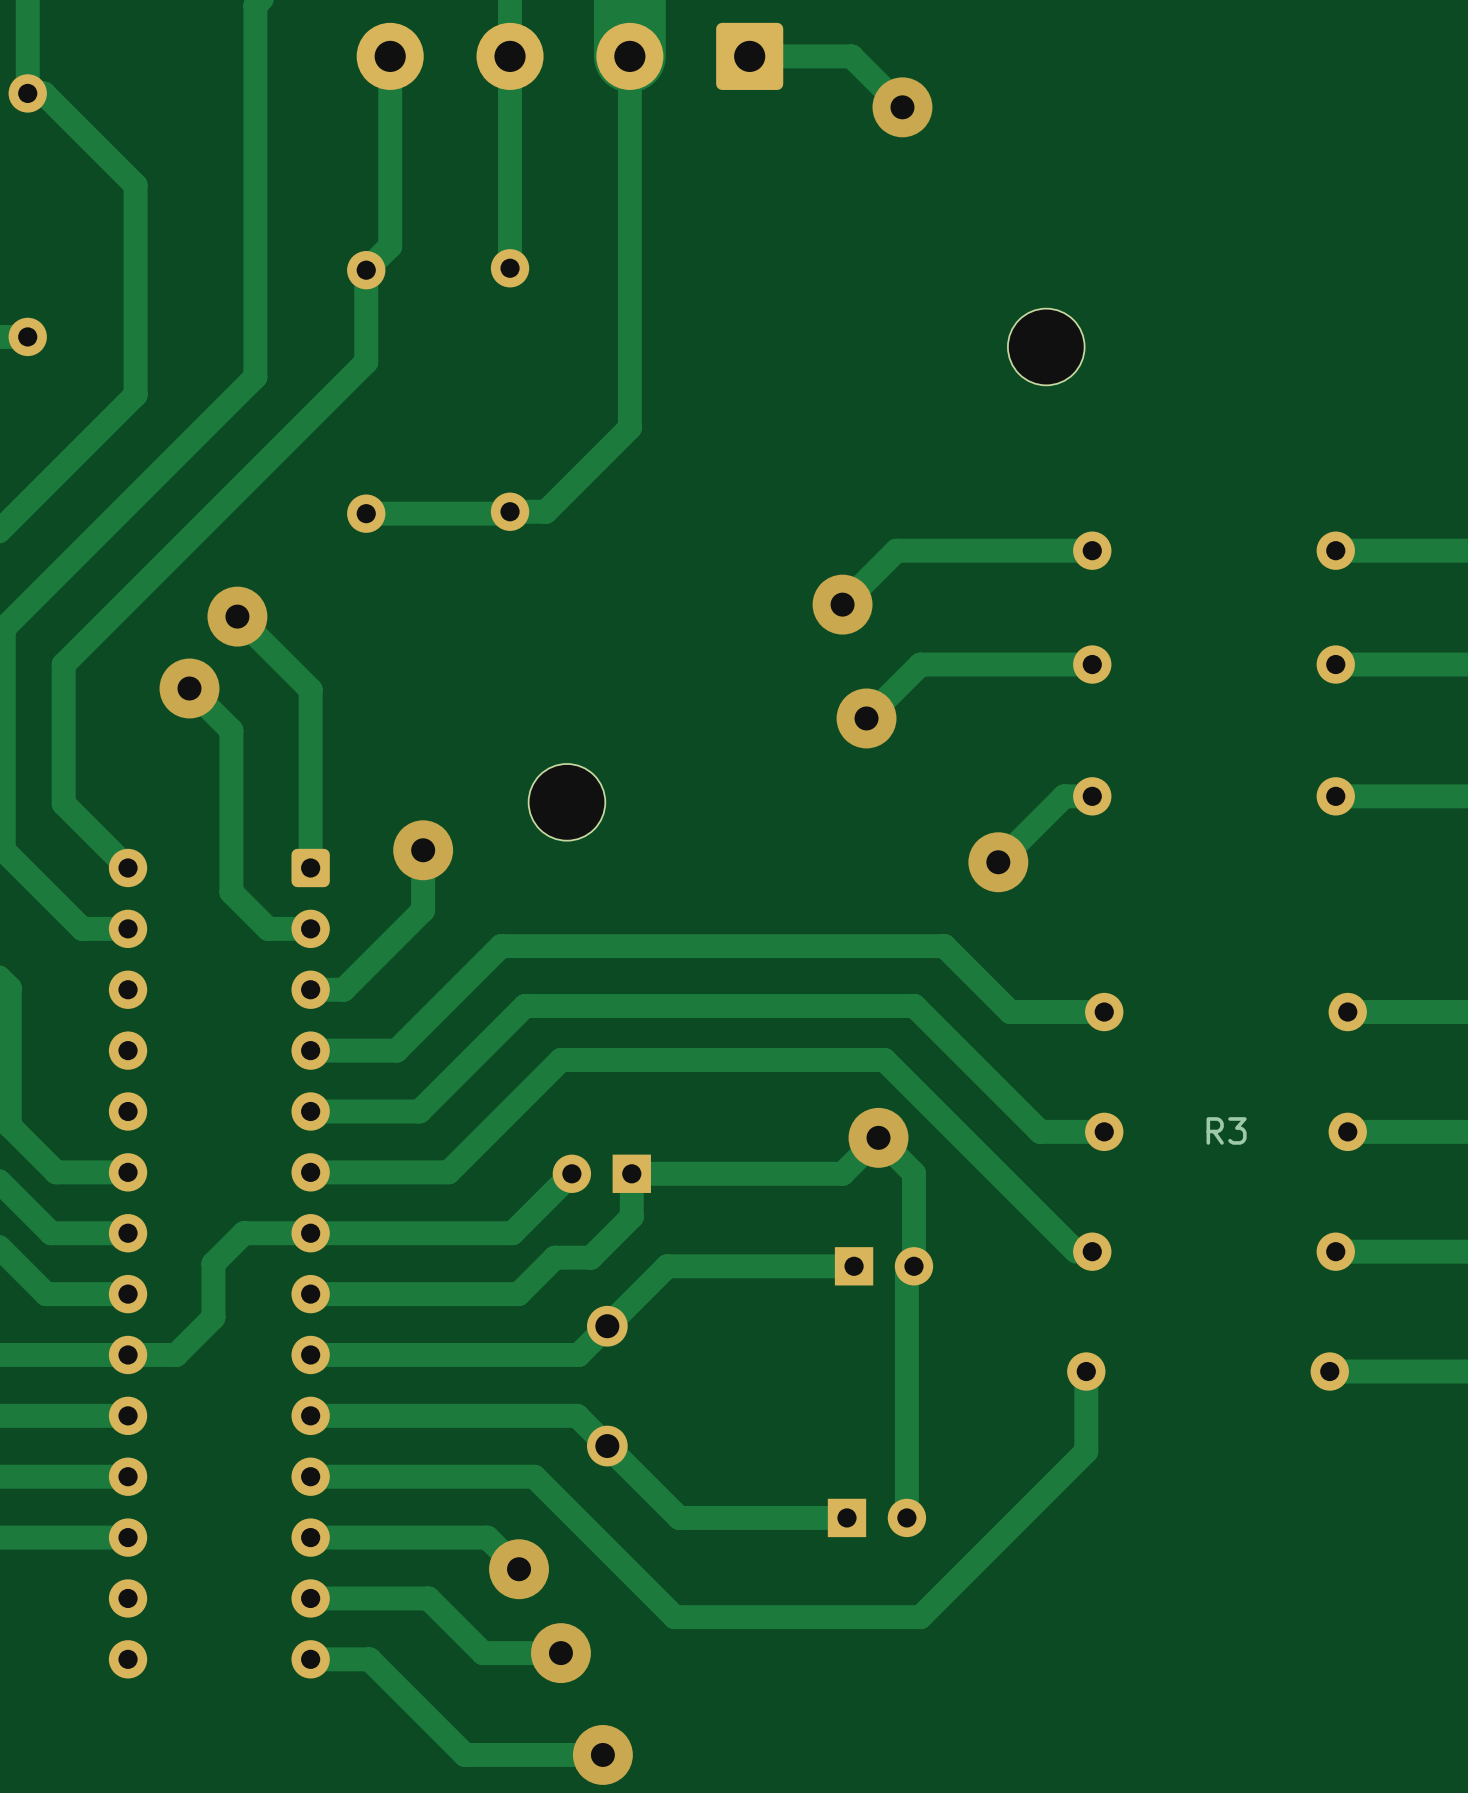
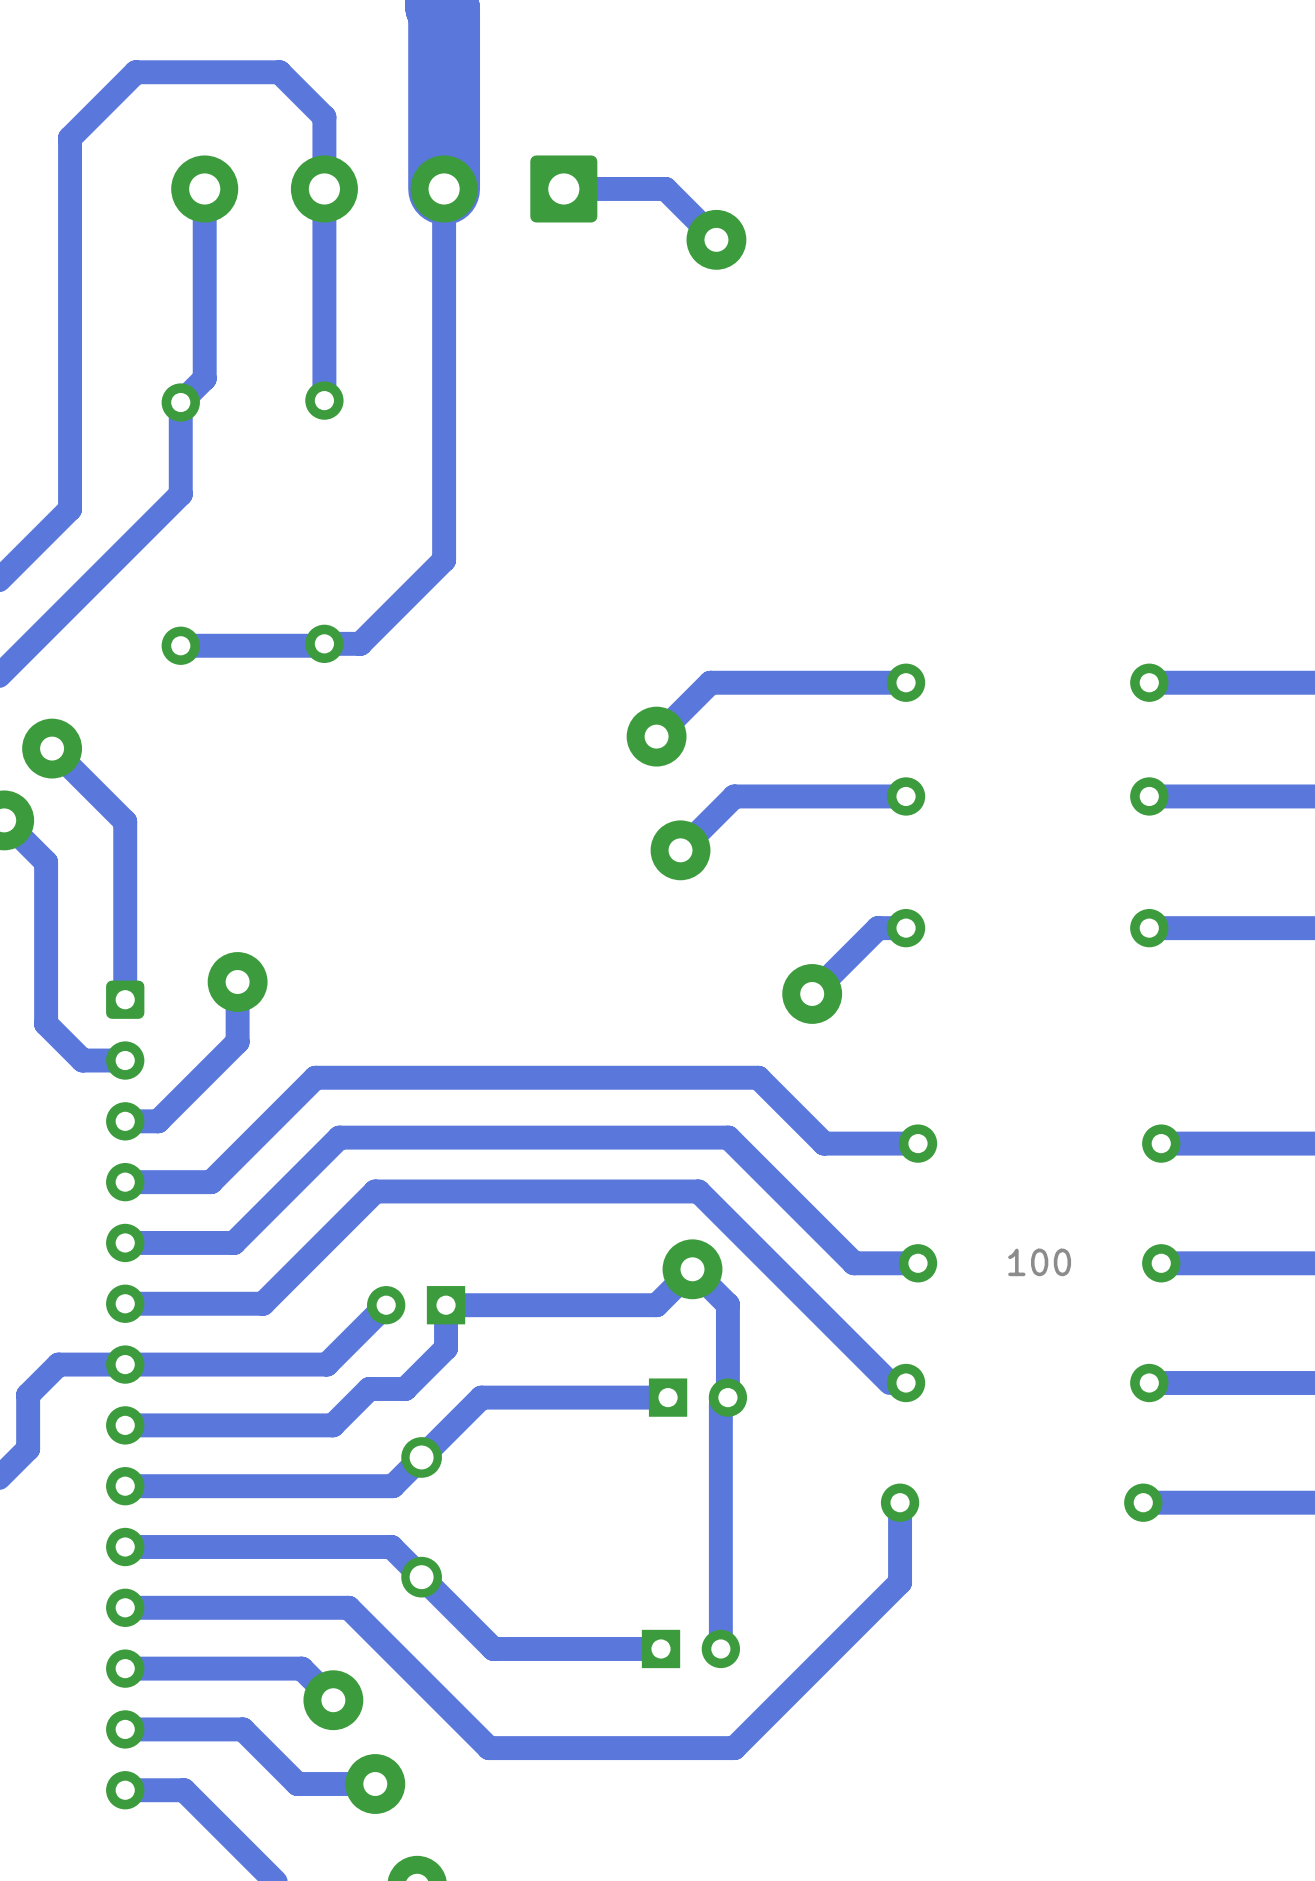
part: (1046, 346) -> none
part: (566, 802) -> none
R3 name: R3 (1226, 1130) -> 100 (1039, 1262)

